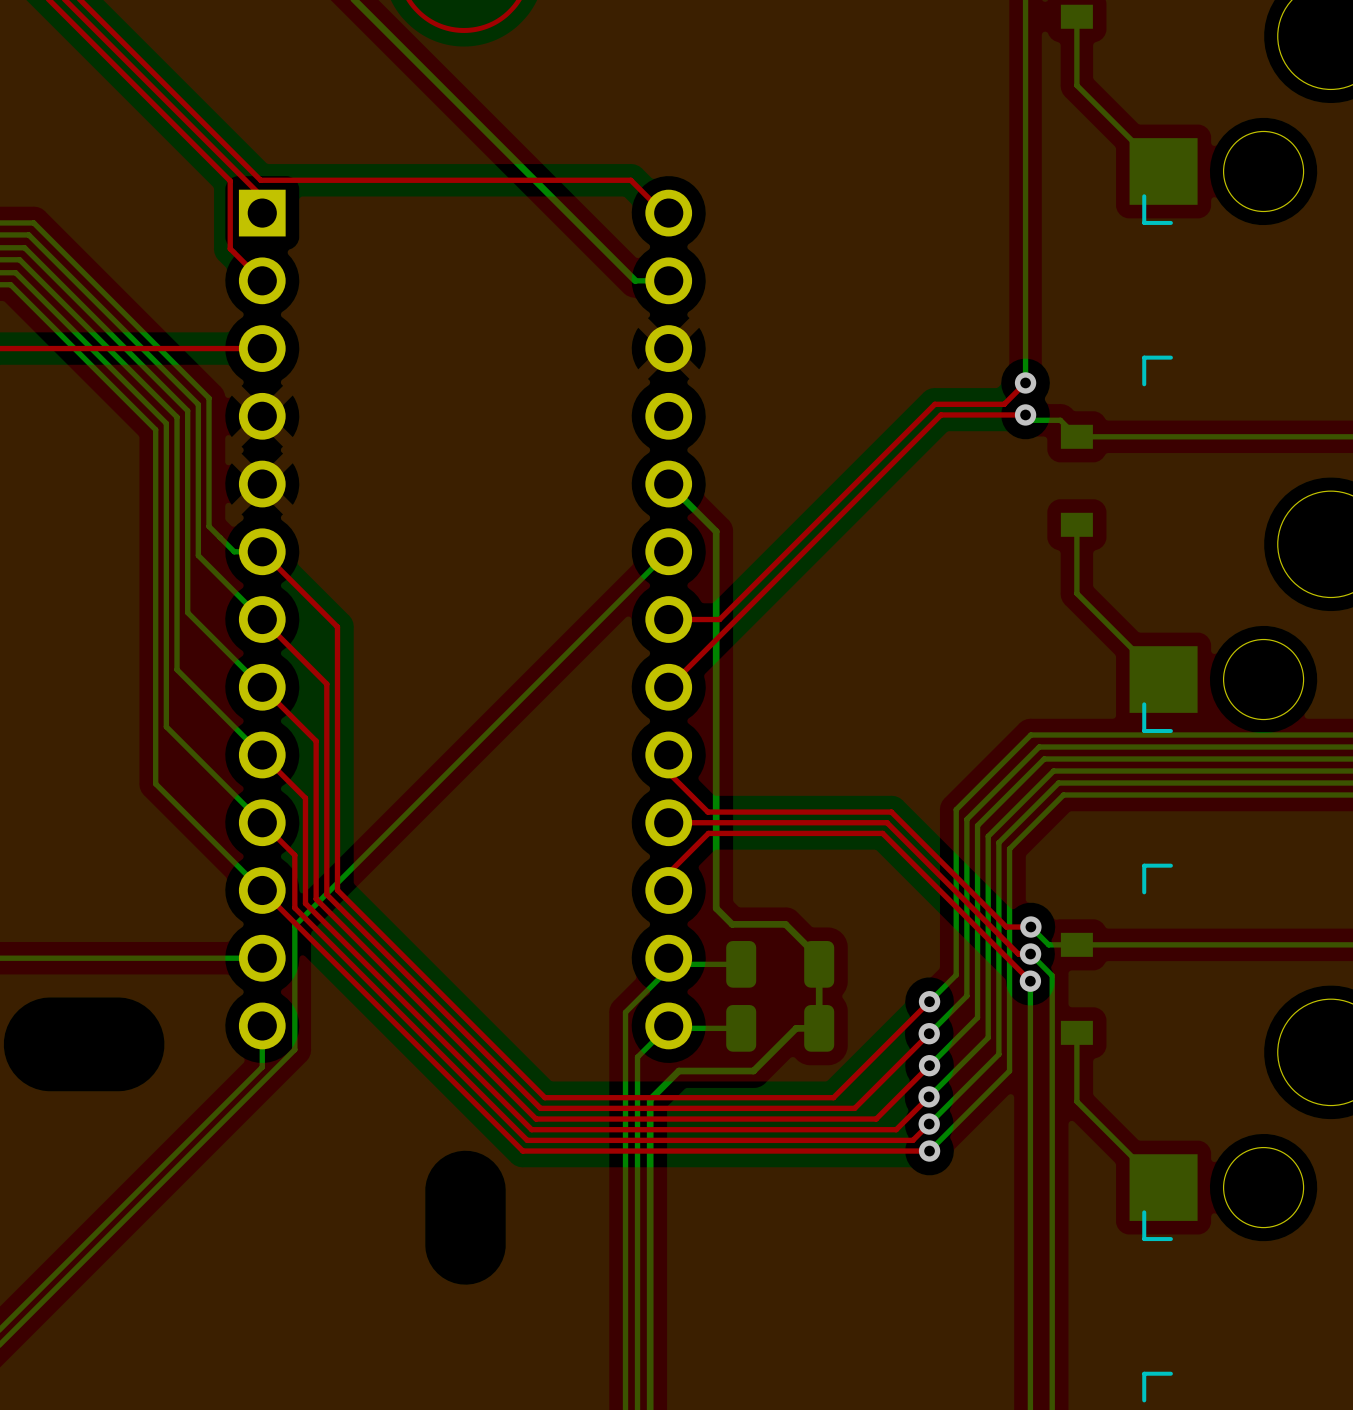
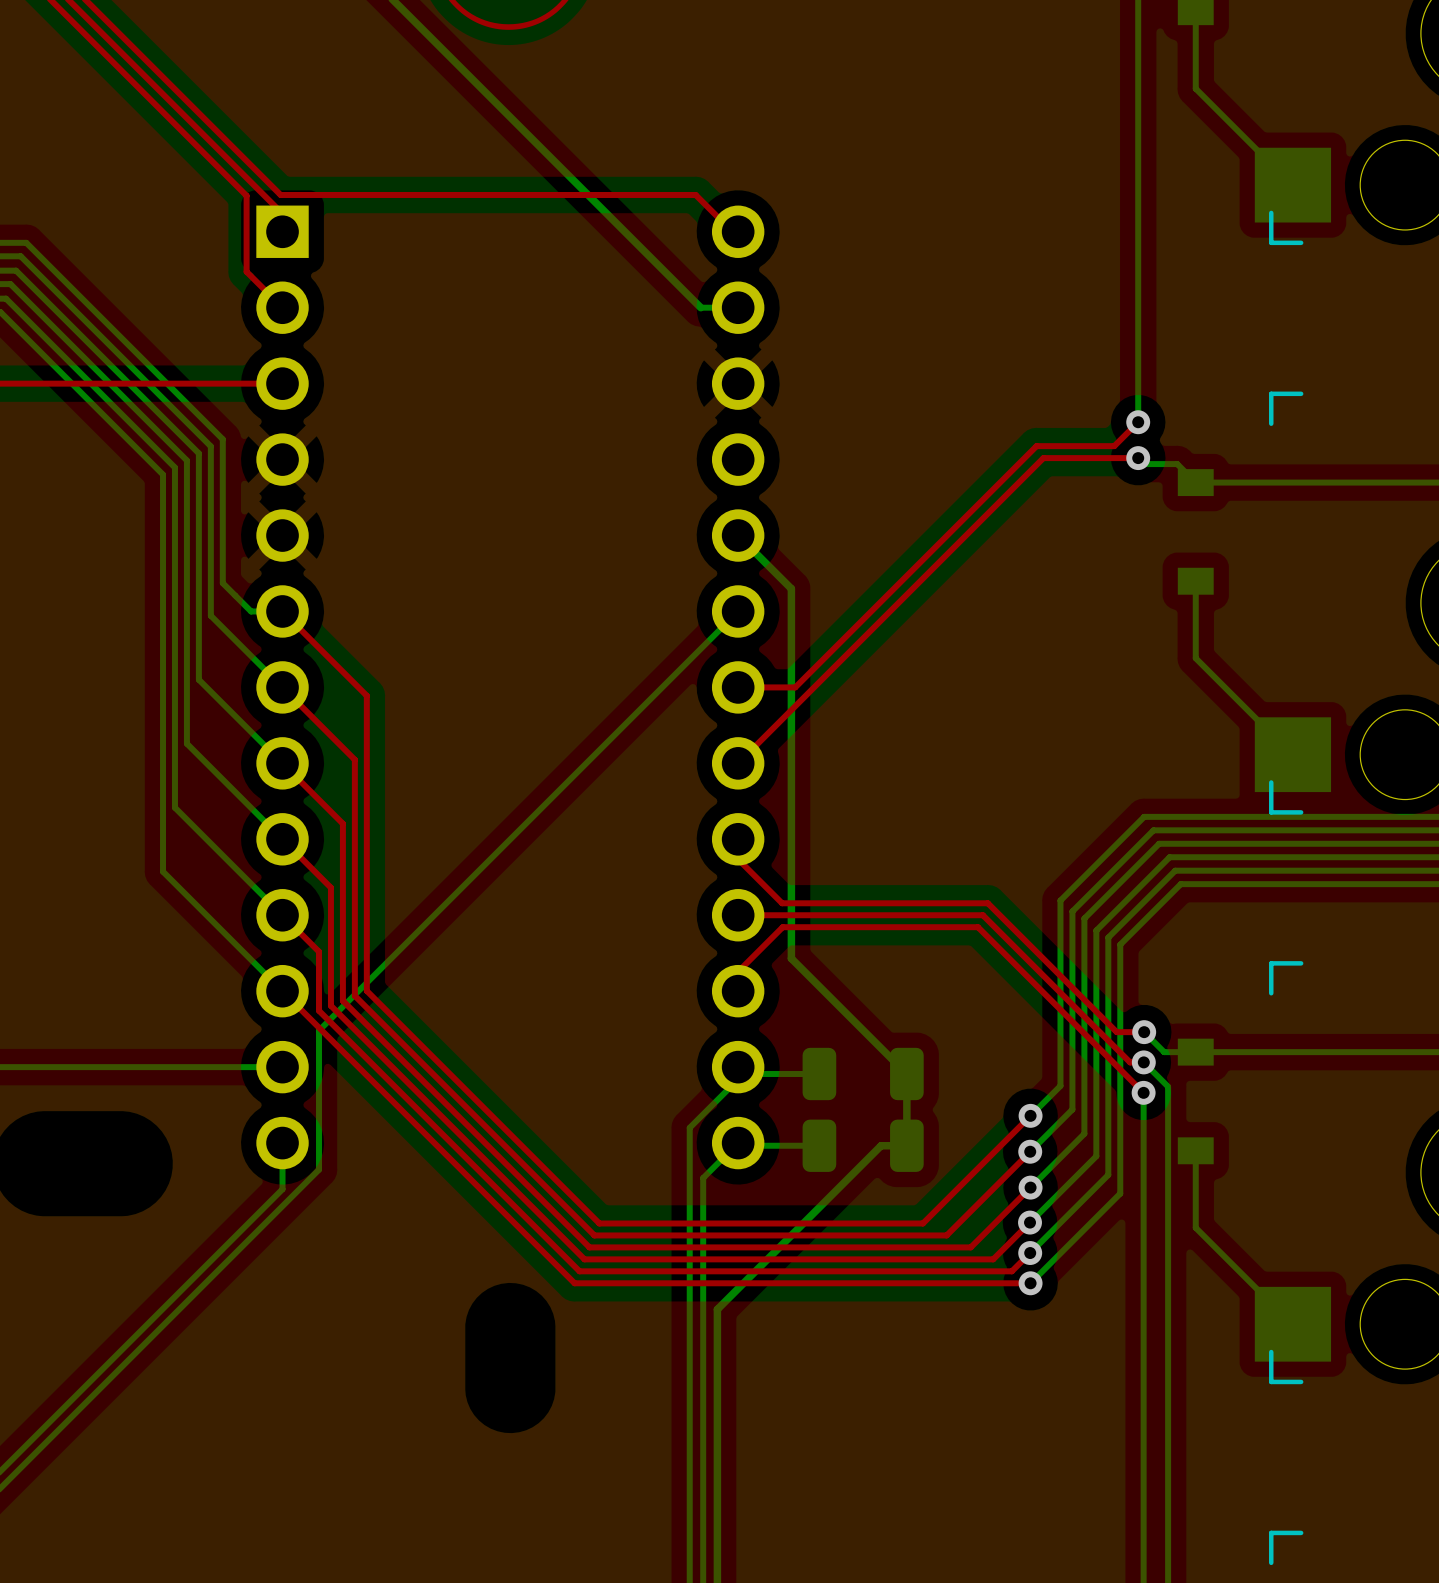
bottom track: (716, 861) (716, 908) (732, 924) (785, 924) (819, 958) (819, 964) -> (791, 958) (906, 1073)
bottom track: (753, 1071) (678, 1071) (650, 1099) (650, 1174) -> (833, 1193) (717, 1309)

